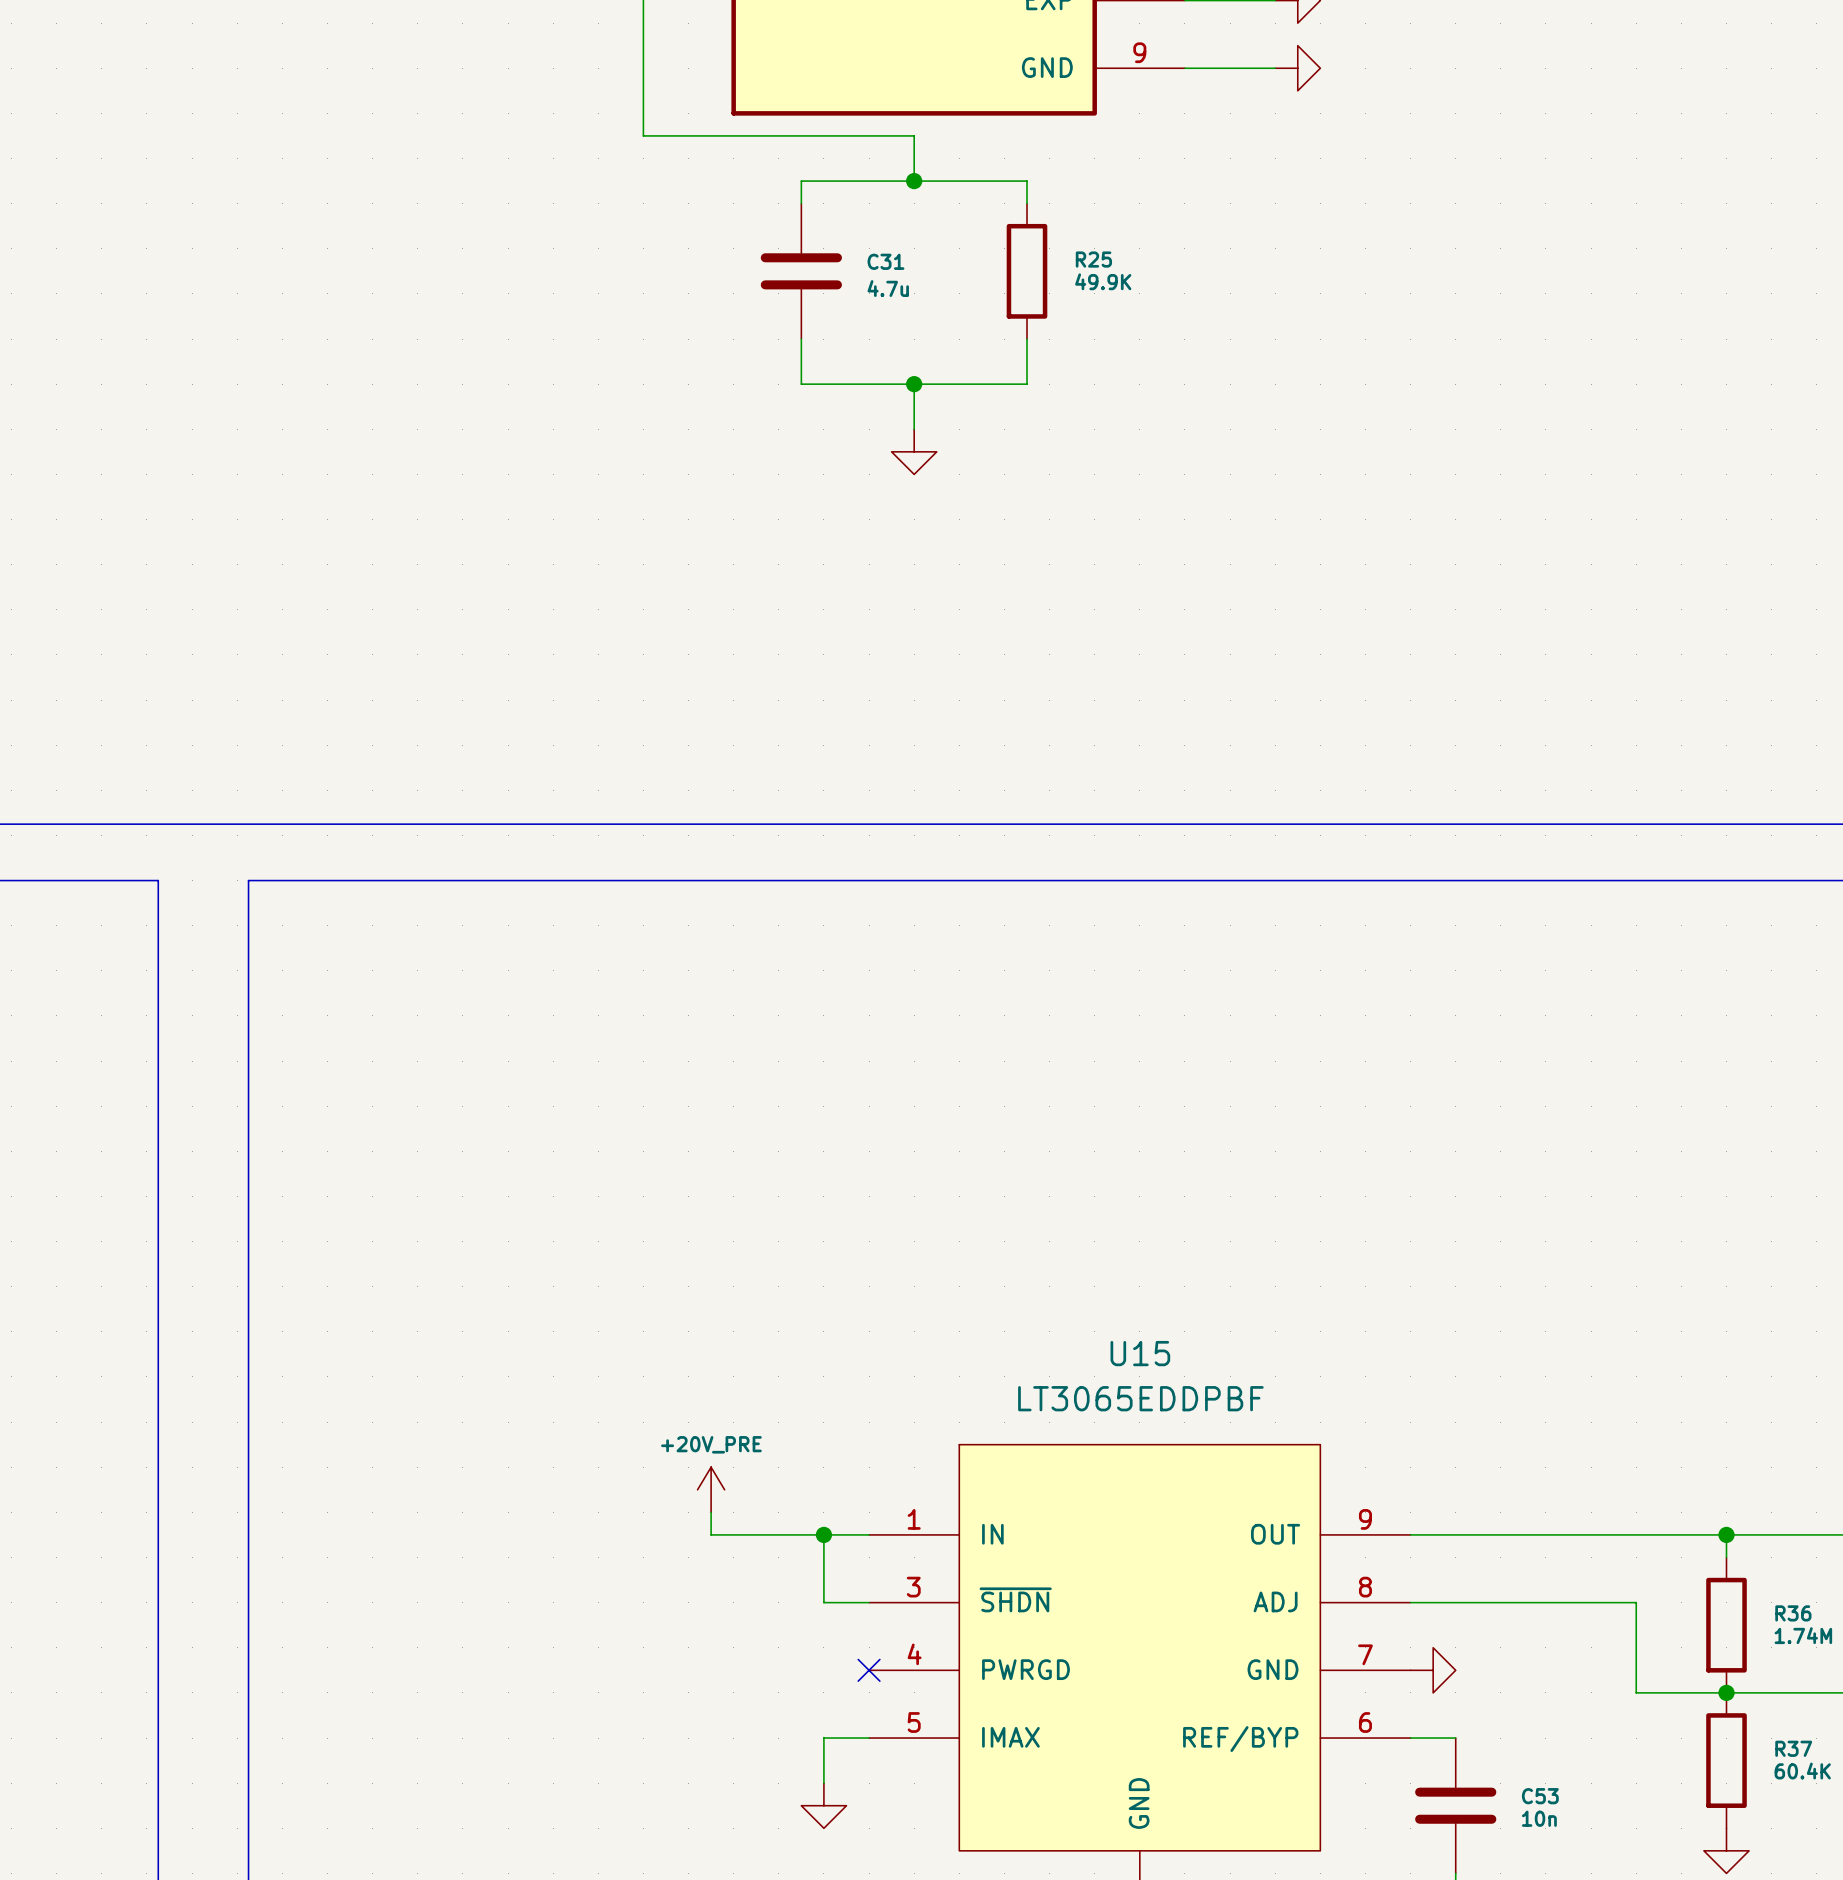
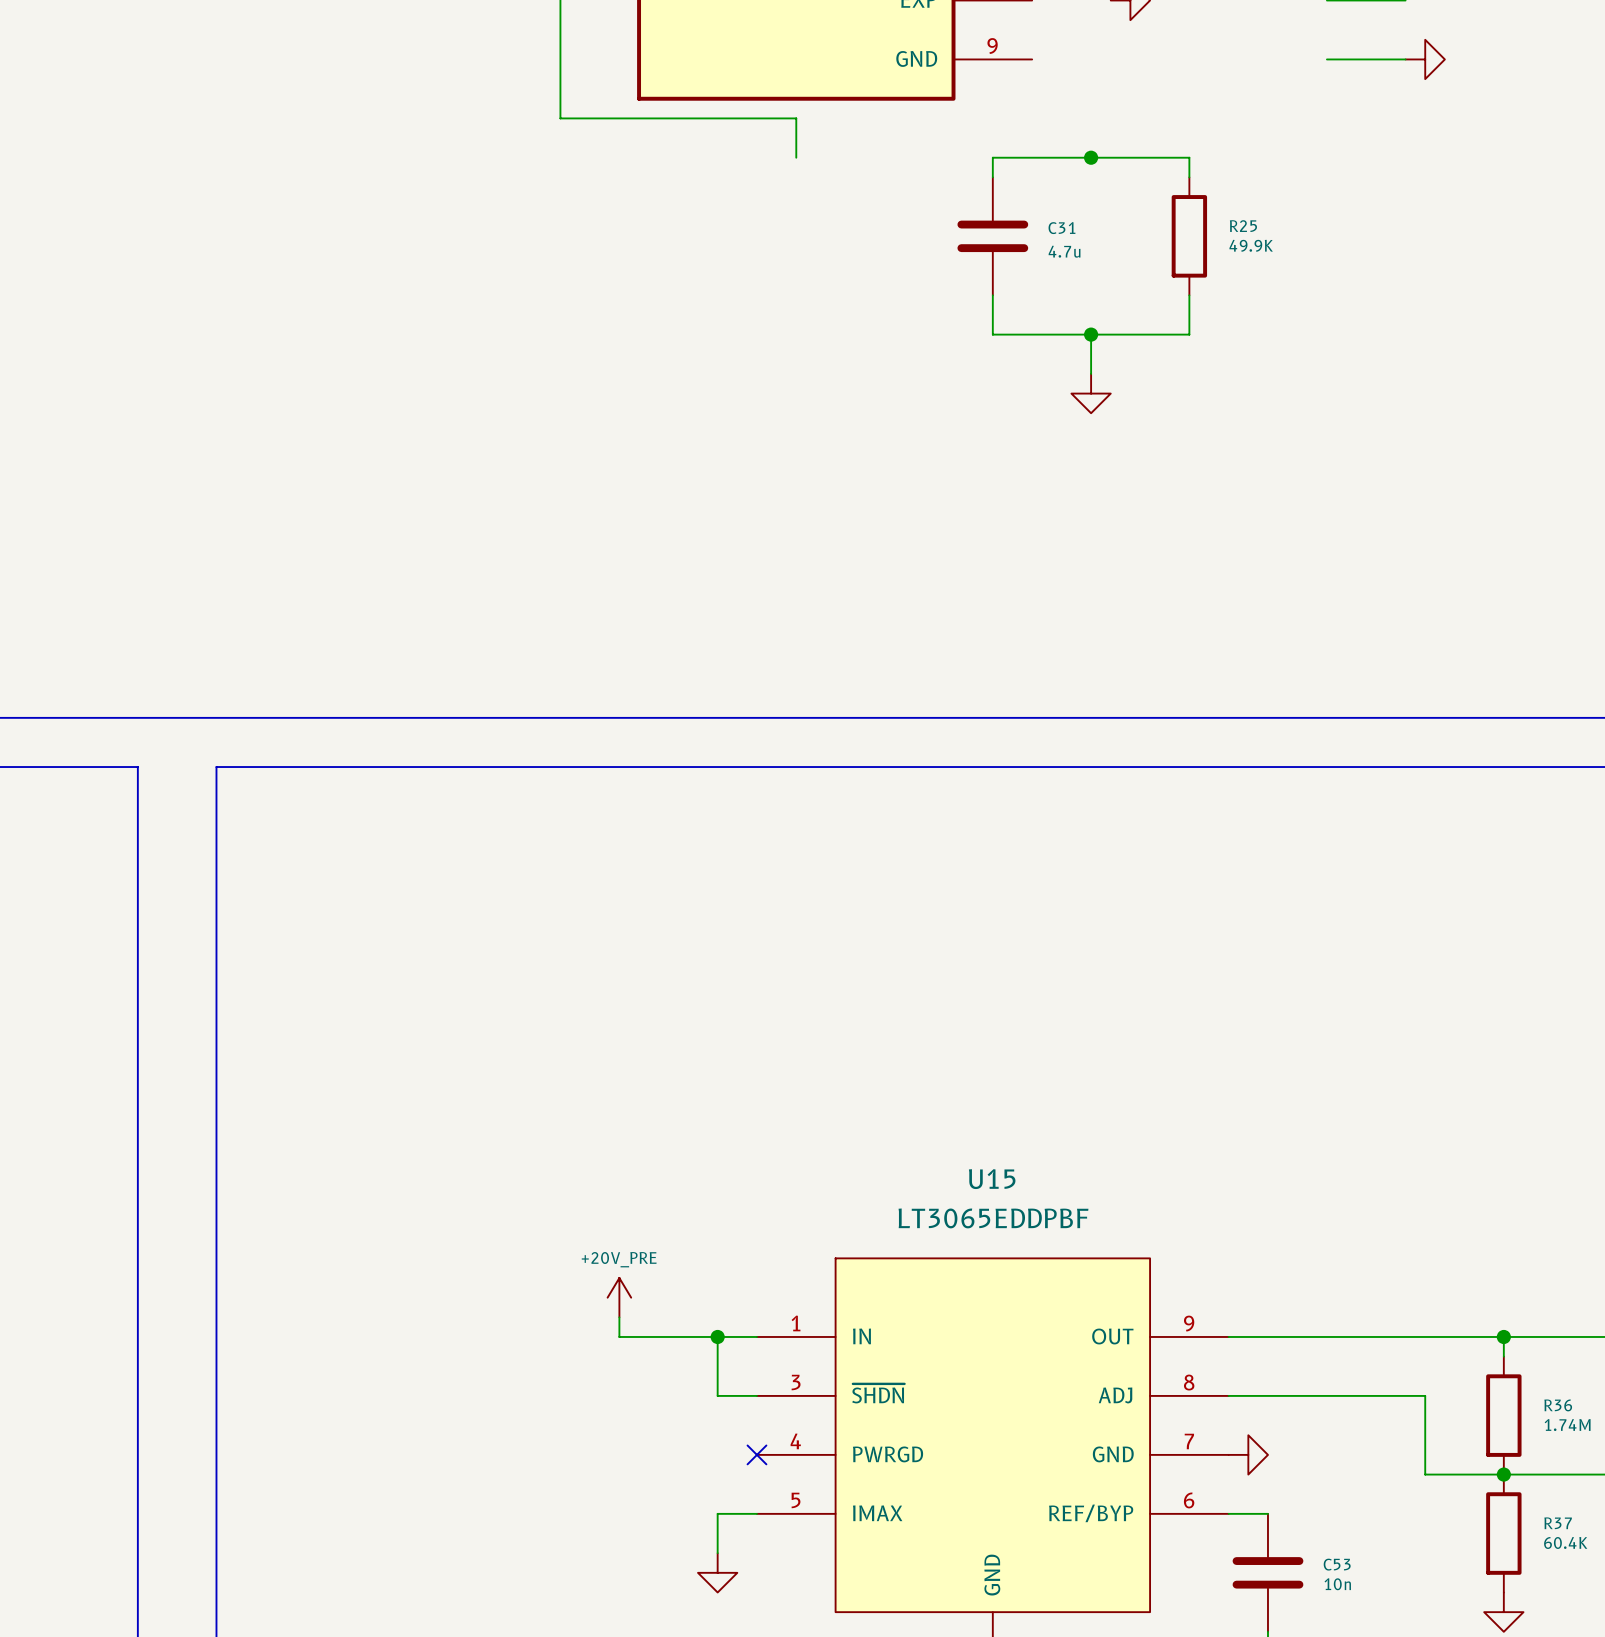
wire: (1184, 0) (1275, 0) -> (1326, 0) (1405, 0)
wire: (1184, 68) (1275, 68) -> (1326, 59) (1405, 59)
power symbol: (1297, 68) -> none
power symbol: none -> (1425, 59)
junction: (914, 181) -> none
junction: none -> (1091, 157)
wire: (801, 203) (801, 181) (1027, 181) (1027, 203) -> (992, 177) (992, 157) (1189, 157) (1189, 177)
C31 position: (801, 271) -> (992, 236)
R25 position: (1027, 271) -> (1189, 236)
wire: (801, 339) (801, 384) (1027, 384) (1027, 339) -> (992, 295) (992, 334) (1189, 334) (1189, 295)
wire: (914, 384) (914, 429) -> (1091, 334) (1091, 373)
junction: (914, 384) -> none
junction: none -> (1091, 334)
power symbol: (914, 451) -> none
power symbol: none -> (1091, 393)

